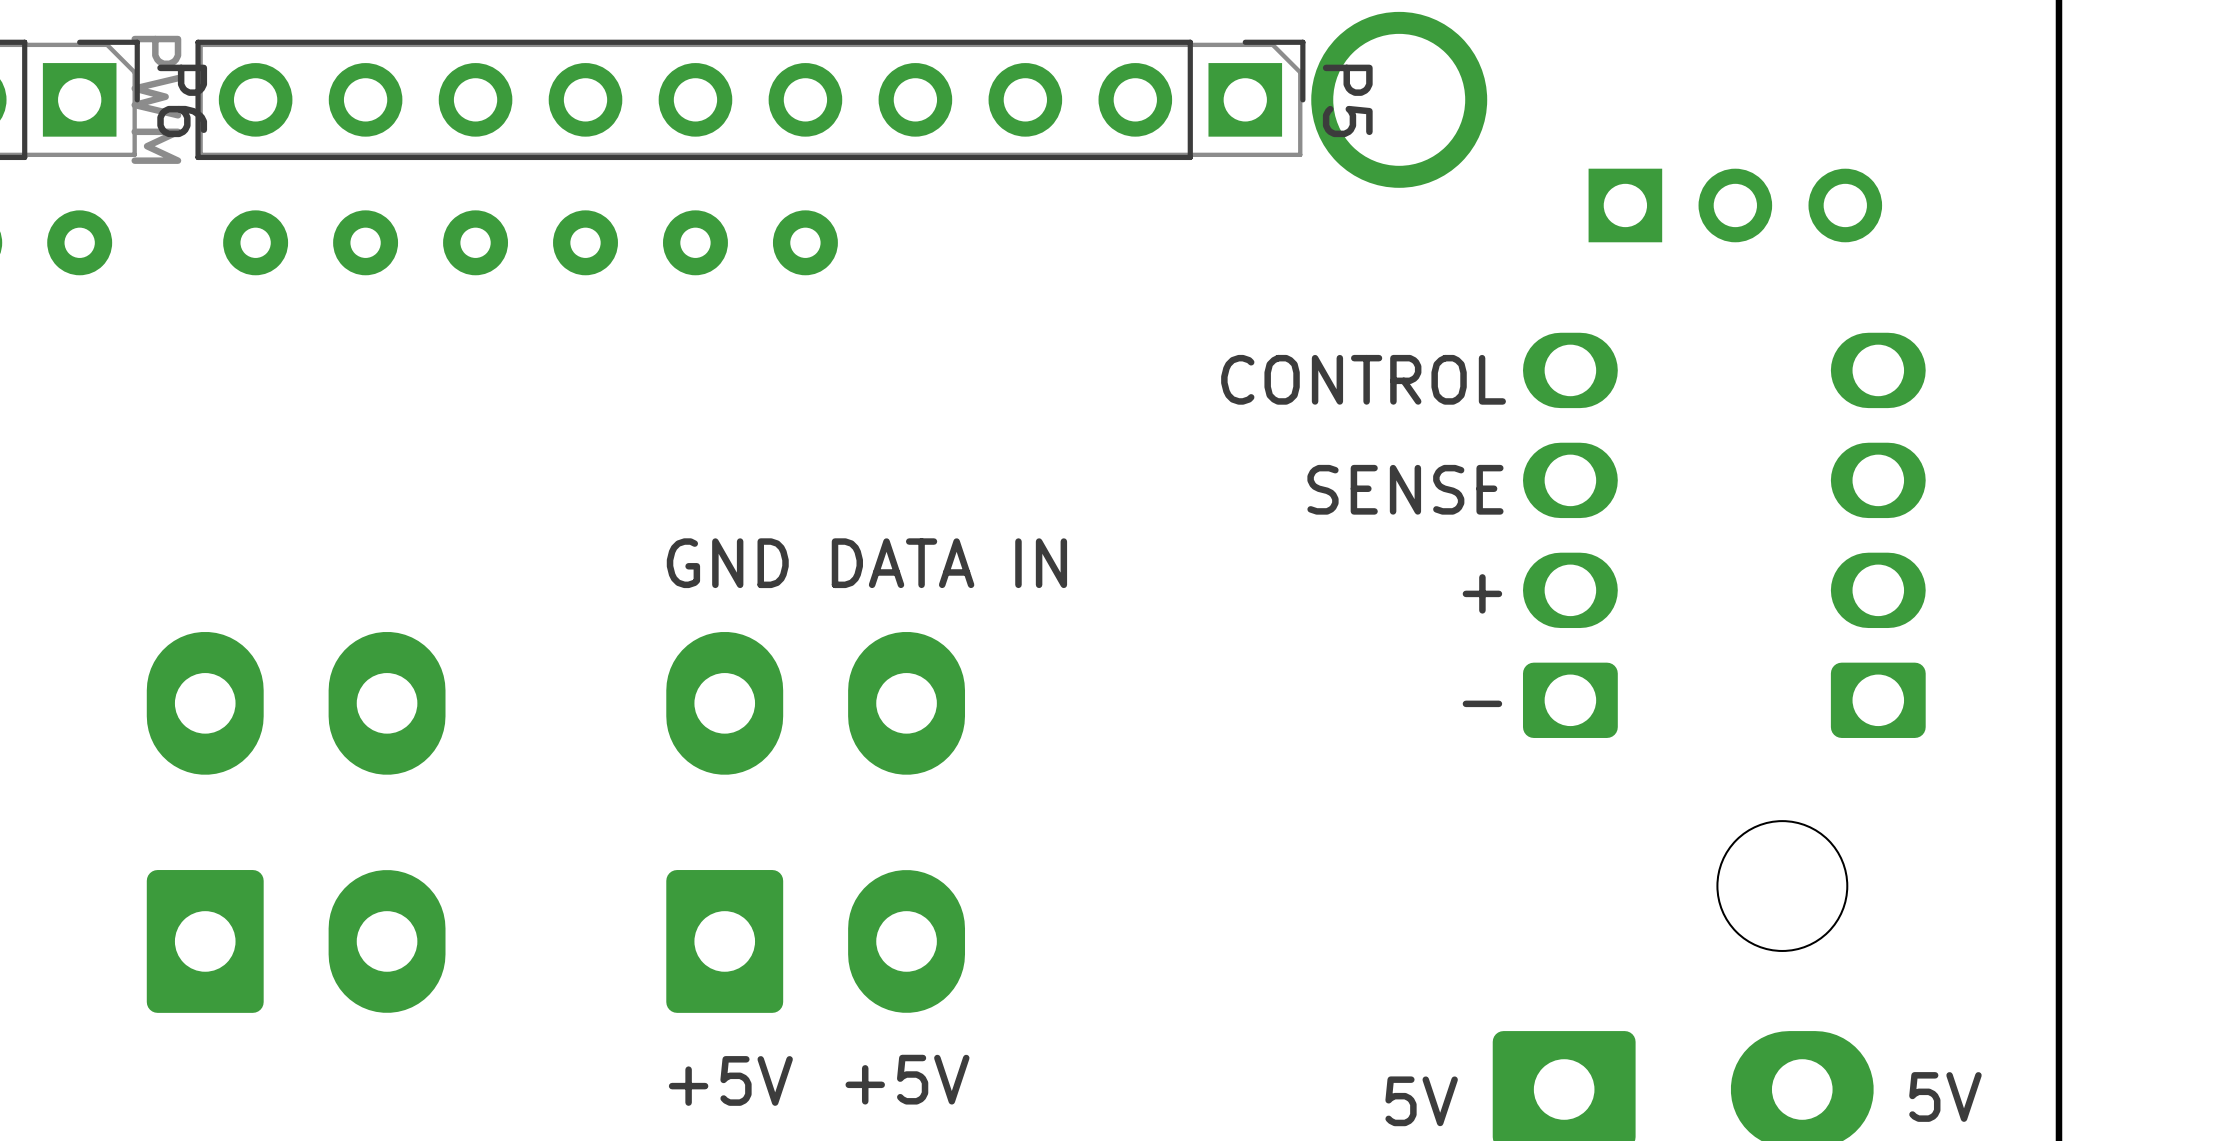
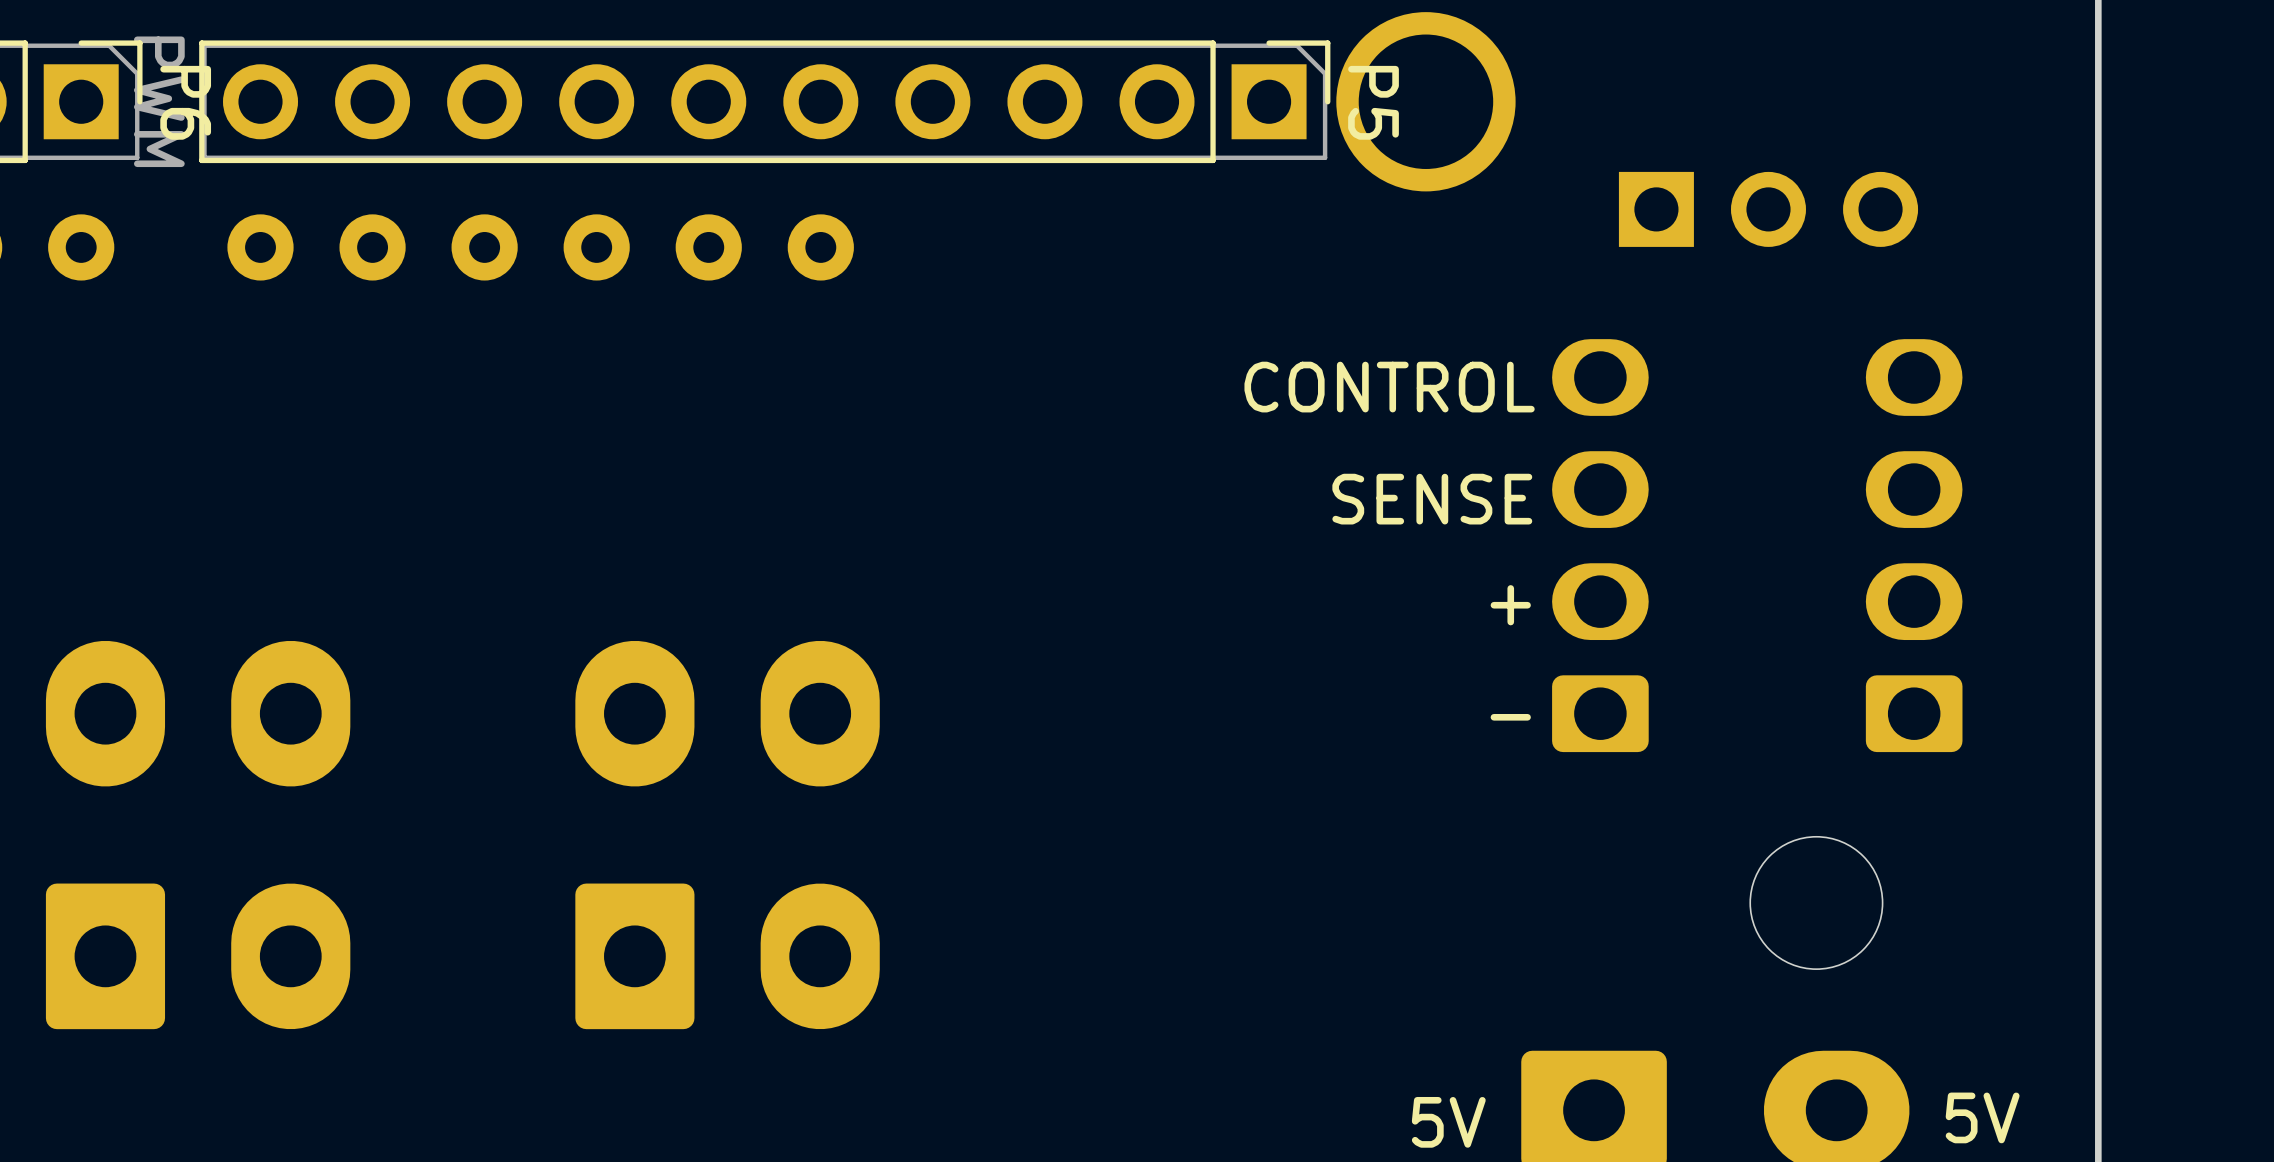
text: GND (727, 563) -> none
text: DATA IN (949, 563) -> none
part position: (296, 822) -> (198, 835)
part position: (815, 822) -> (727, 835)
text: +5V (907, 1079) -> none
text: +5V (730, 1080) -> none

